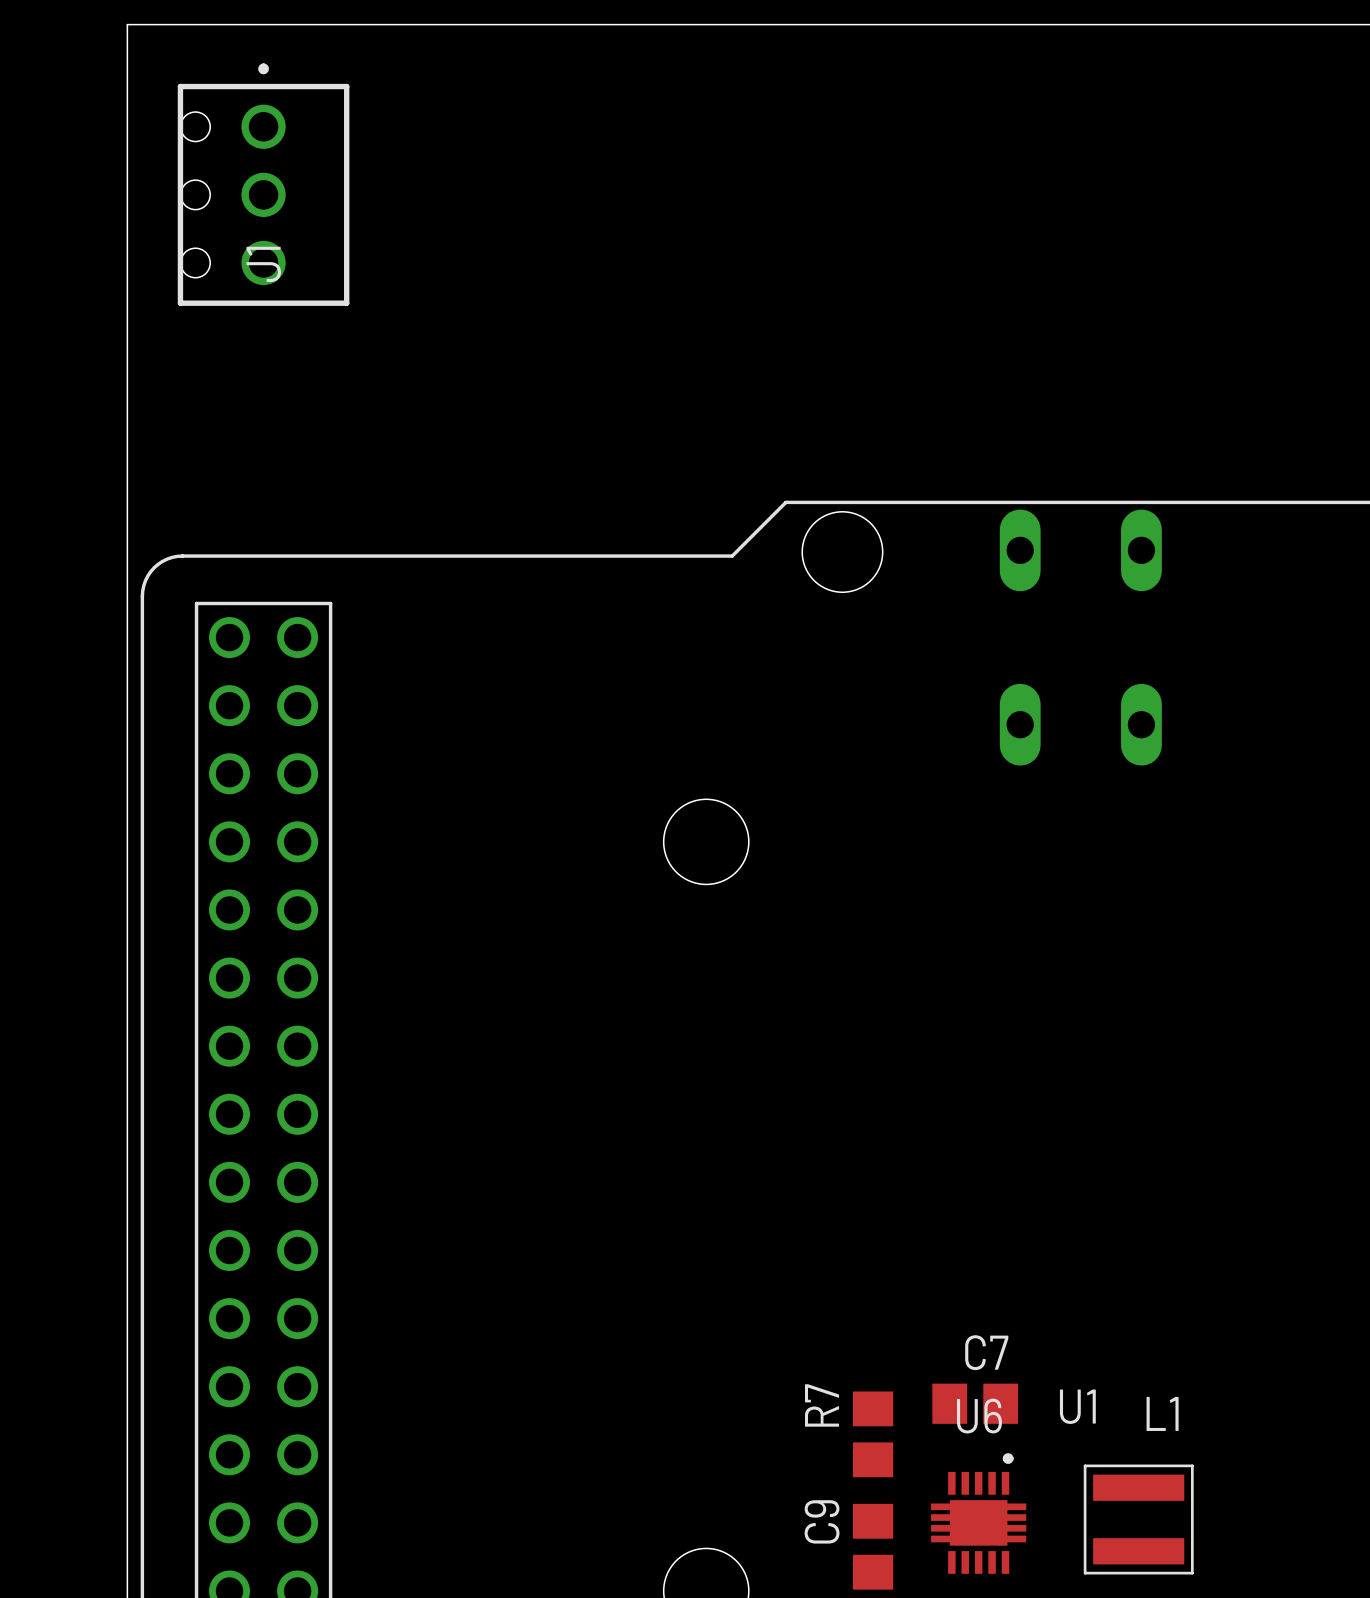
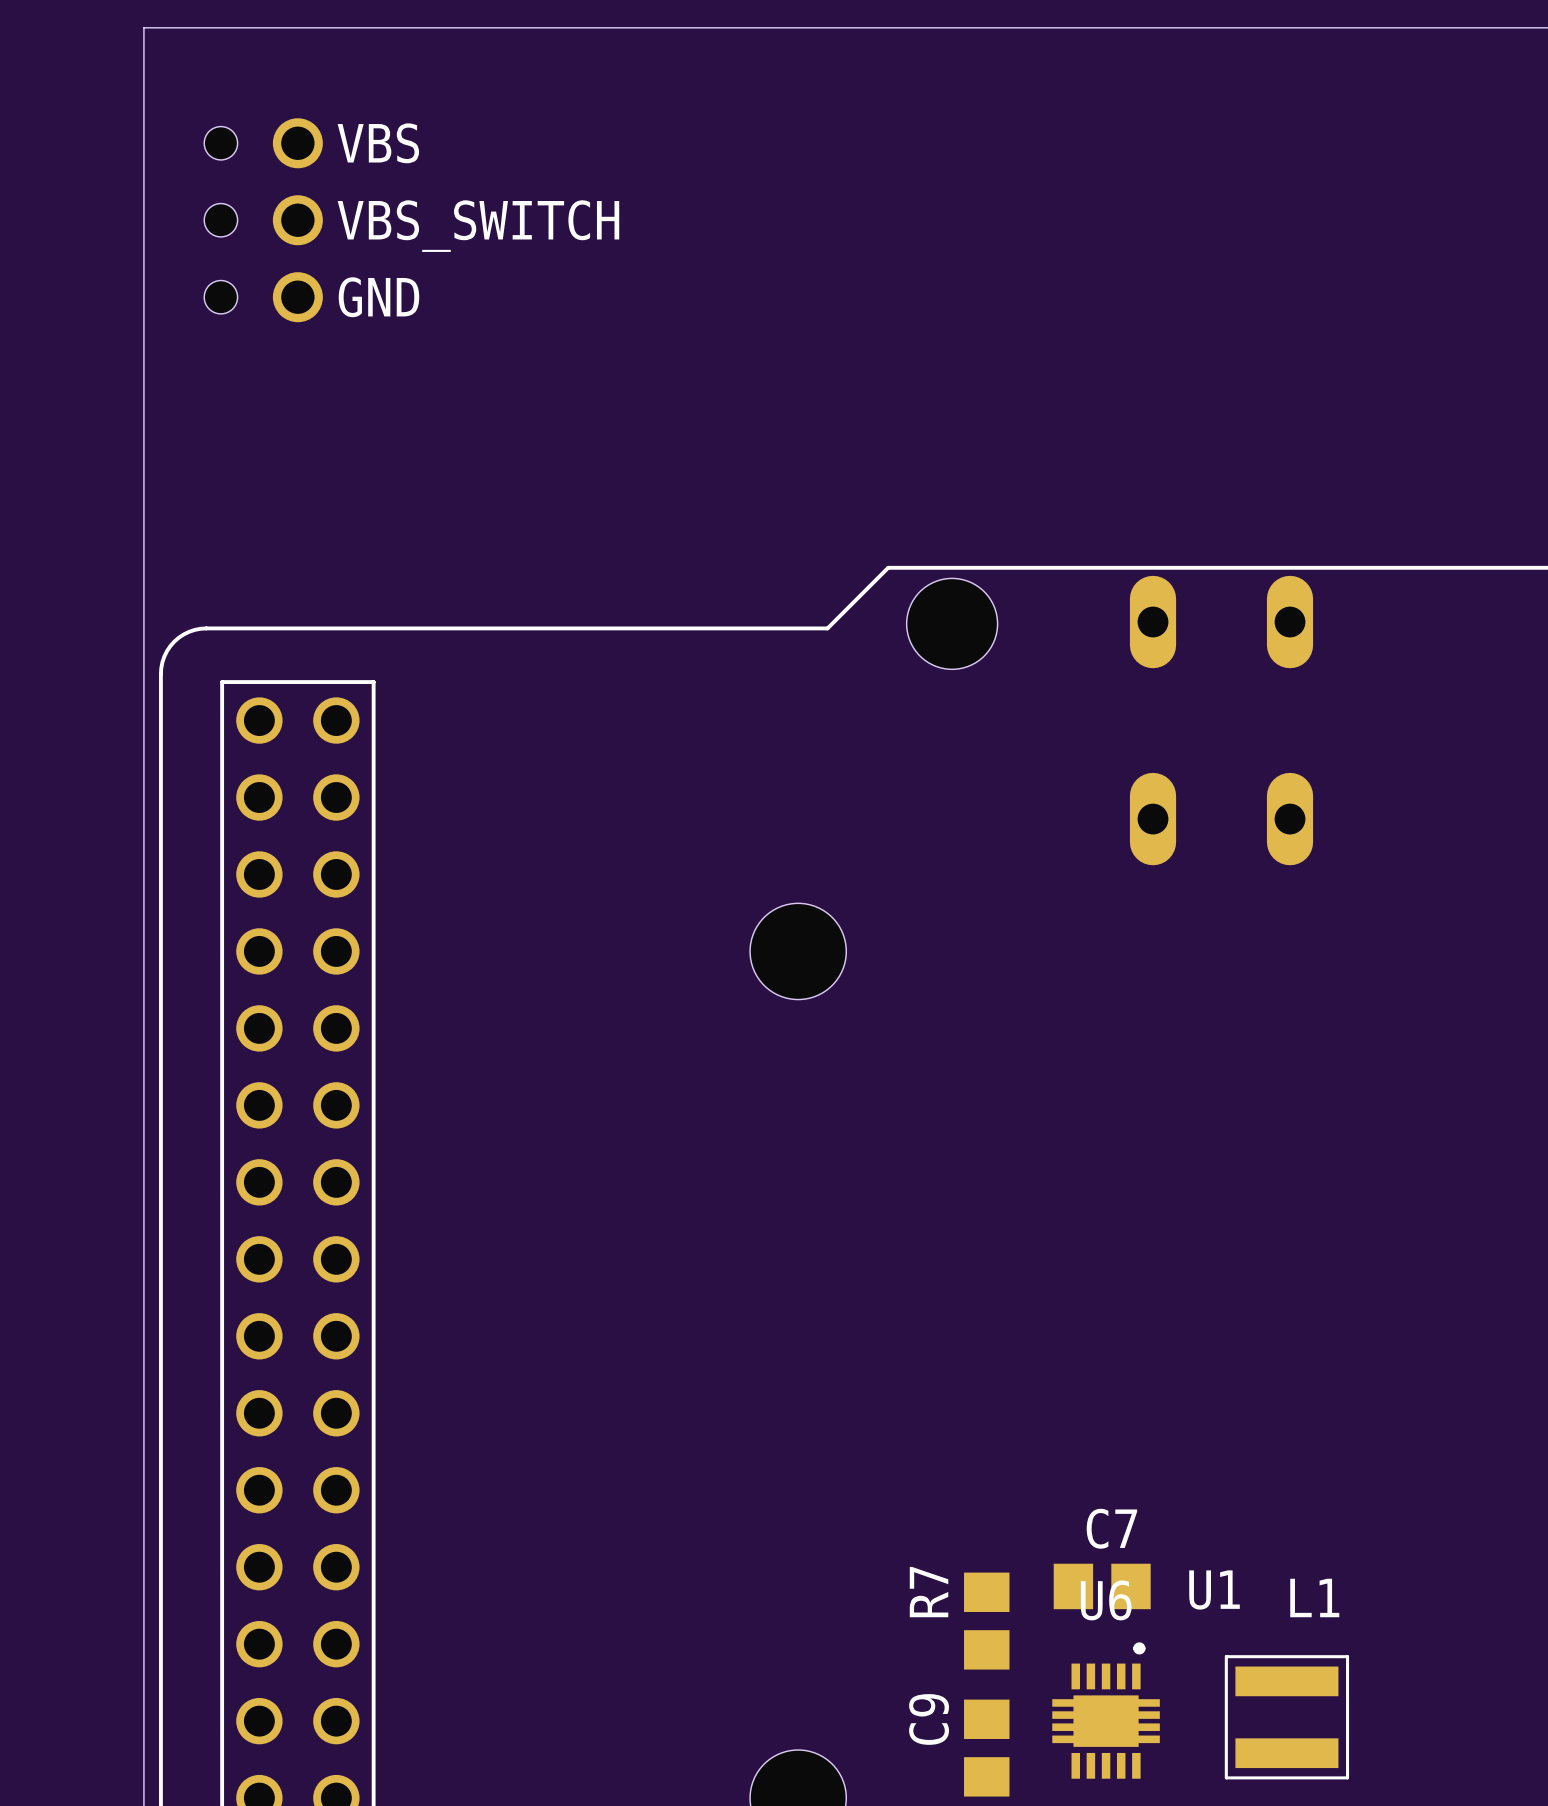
text: none -> VBS (378, 143)
J1 side: top (263, 184) -> bottom (263, 220)
text: none -> VBS_SWITCH (478, 226)
text: none -> GND (378, 297)

